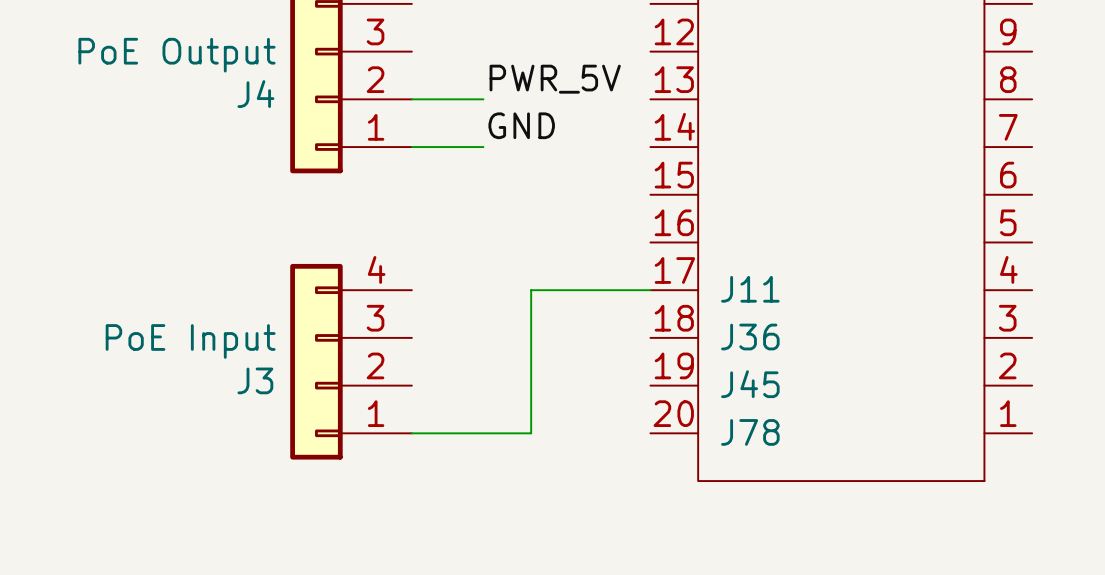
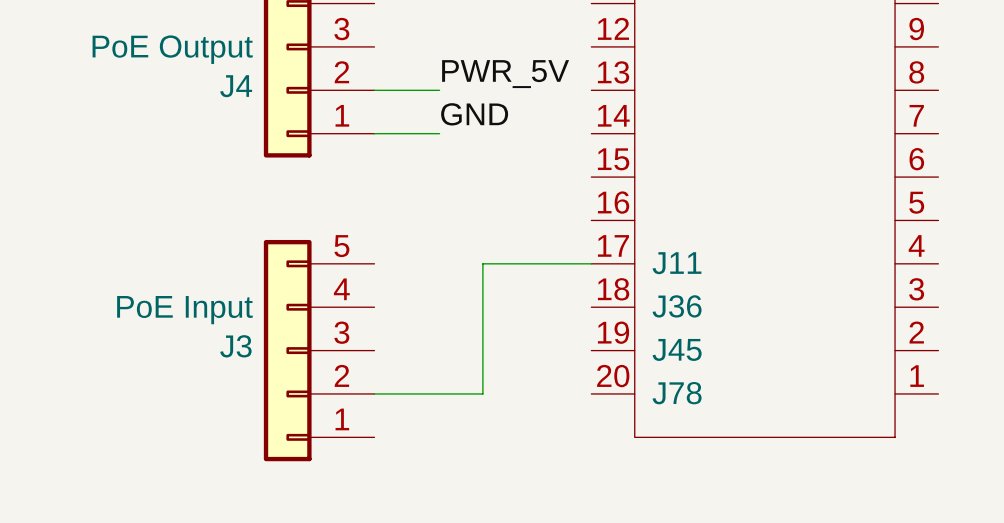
J3 symbol: [290, 263, 412, 460] -> [263, 239, 375, 462]

